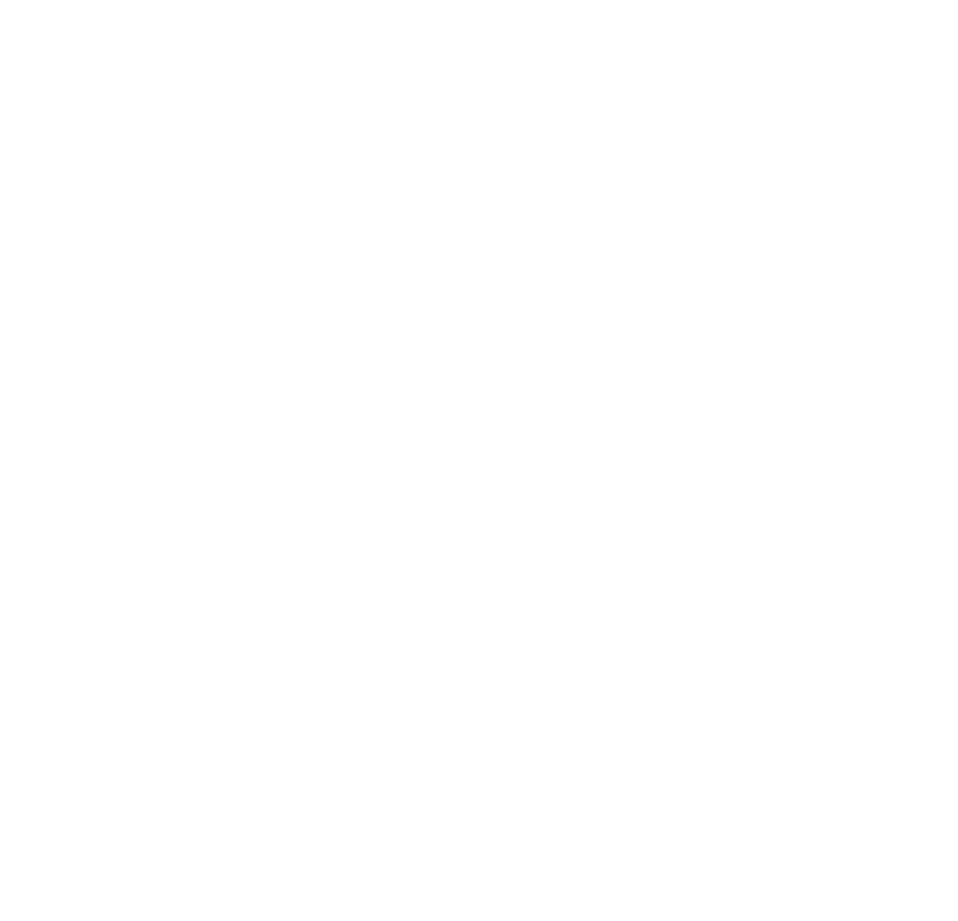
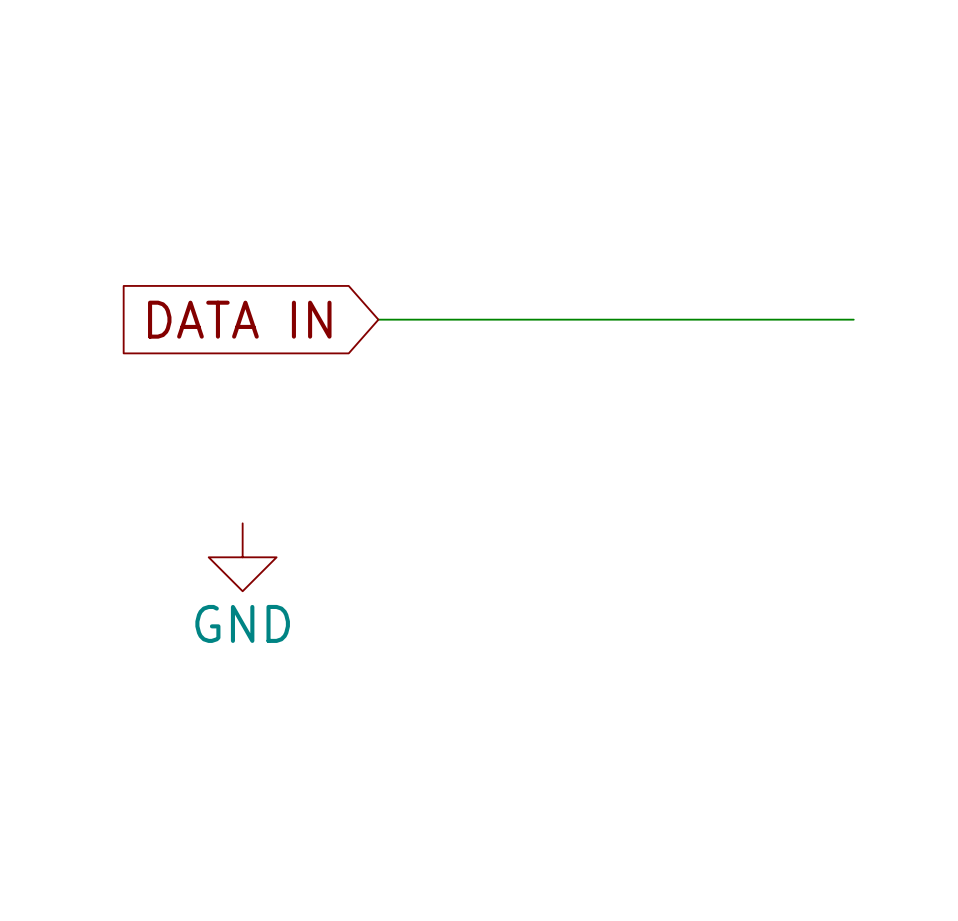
global label: none -> DATA IN (239, 319)
wire: none -> (378, 319) (853, 319)
power symbol: none -> GND (242, 557)

